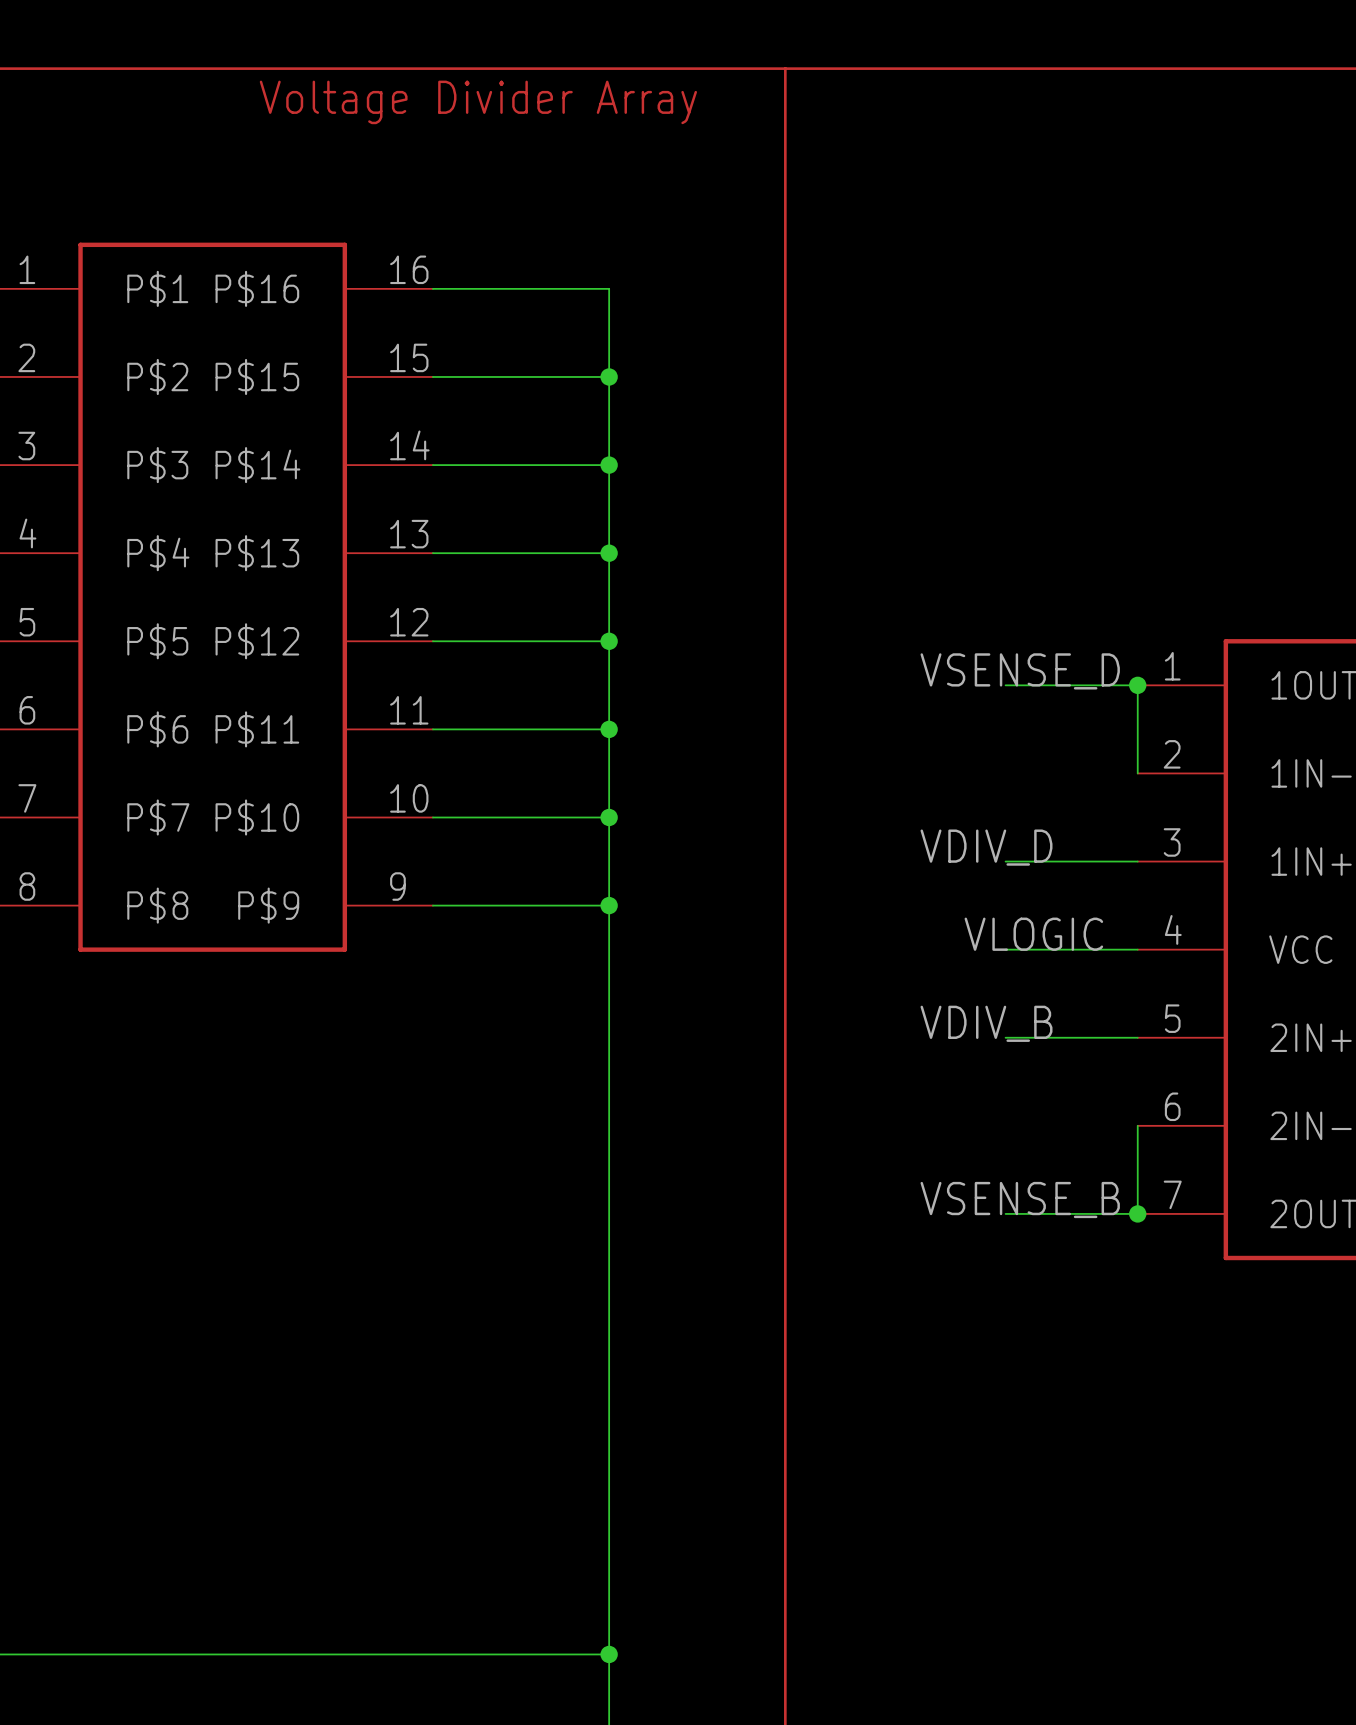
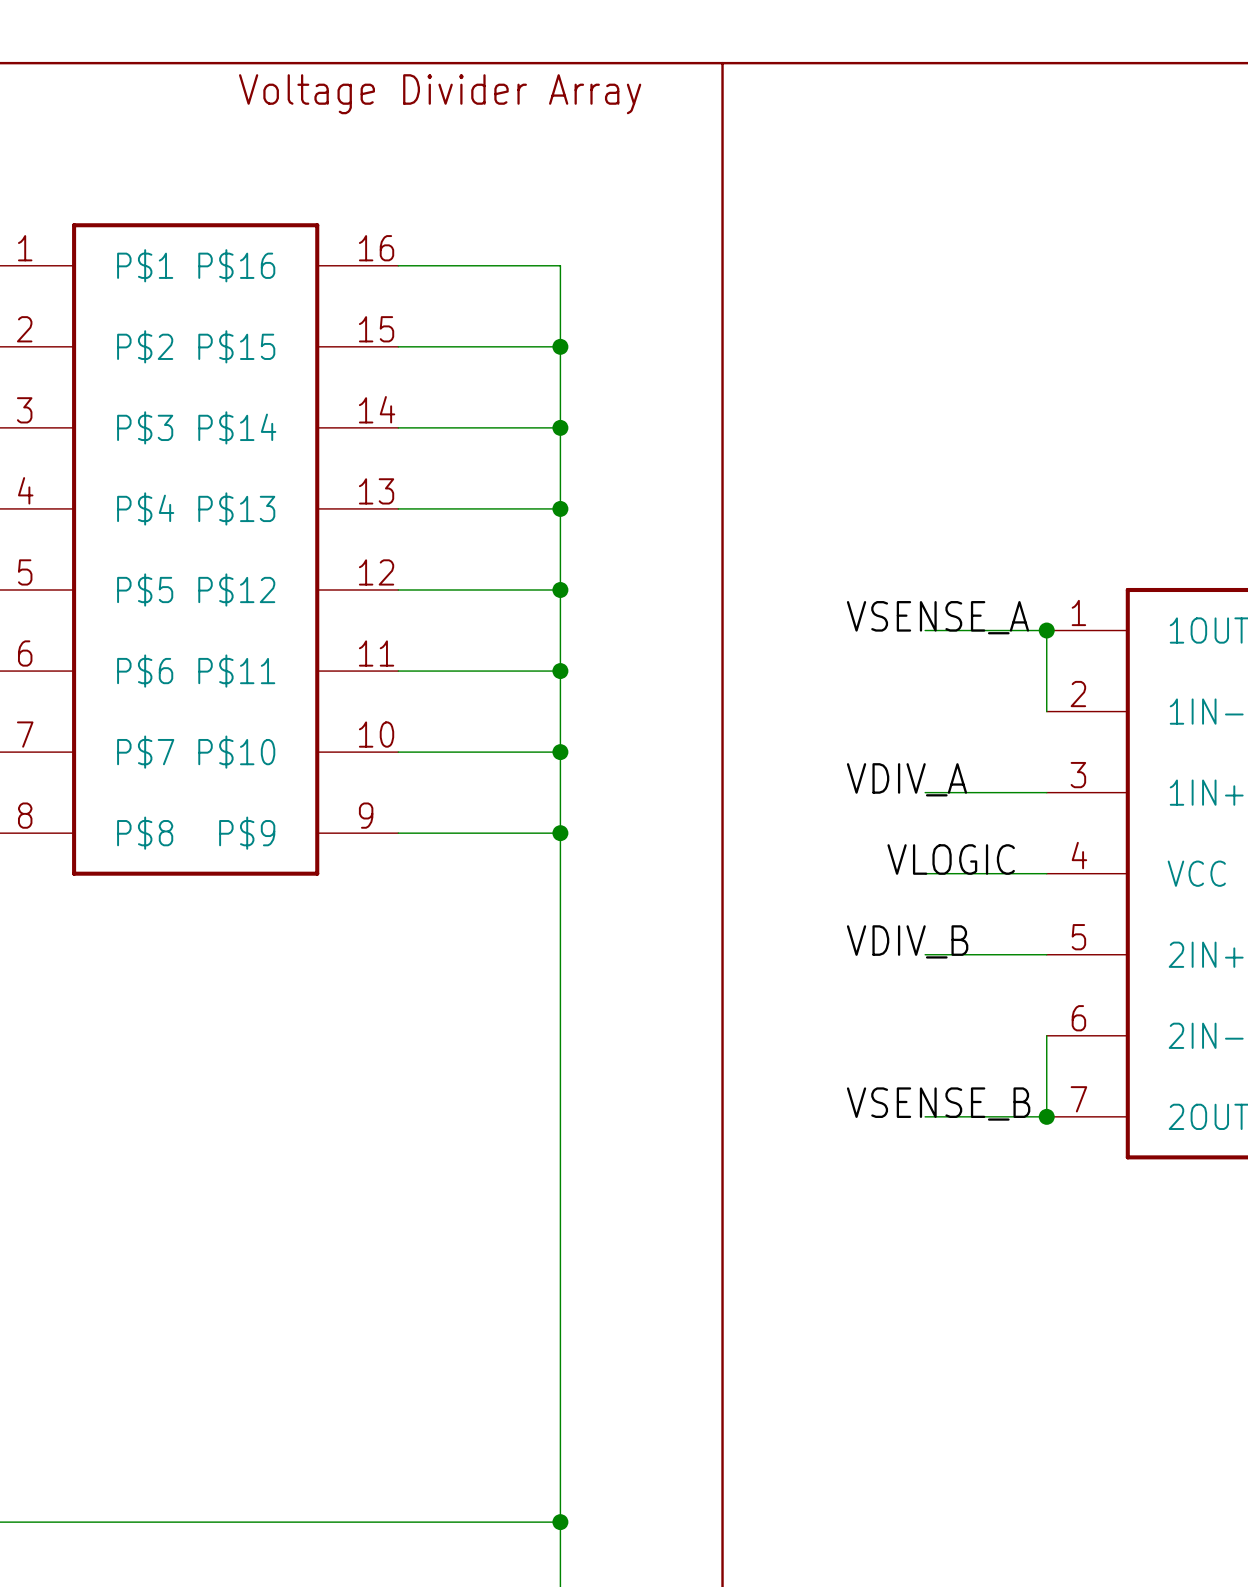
label: VSENSE_D (1020, 671) -> VSENSE_A (938, 617)
label: VDIV_D (986, 847) -> VDIV_A (906, 779)

